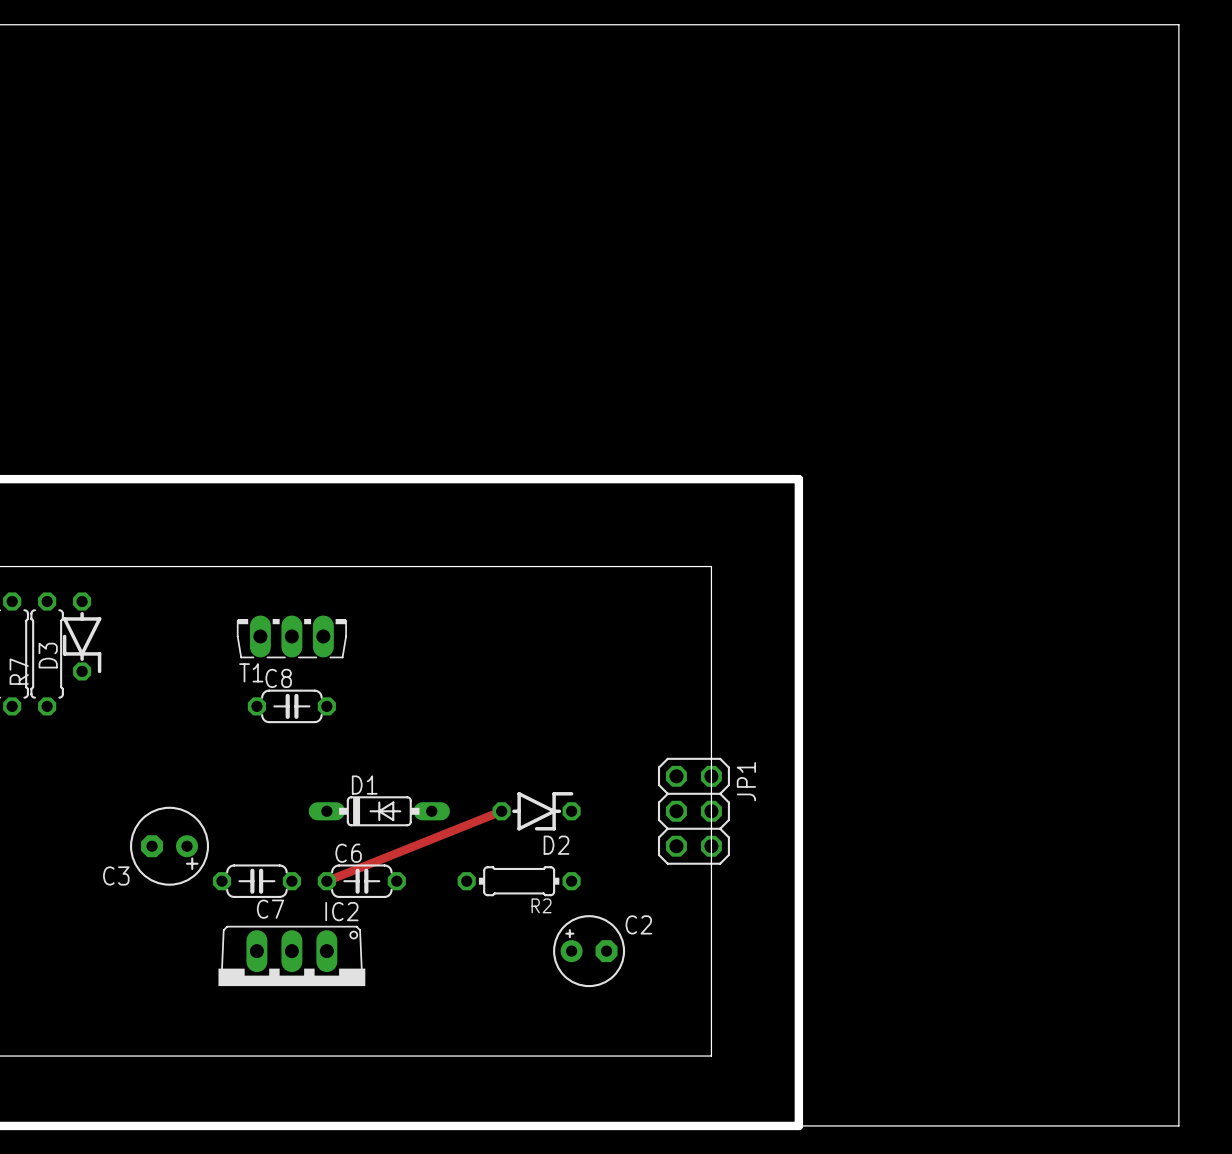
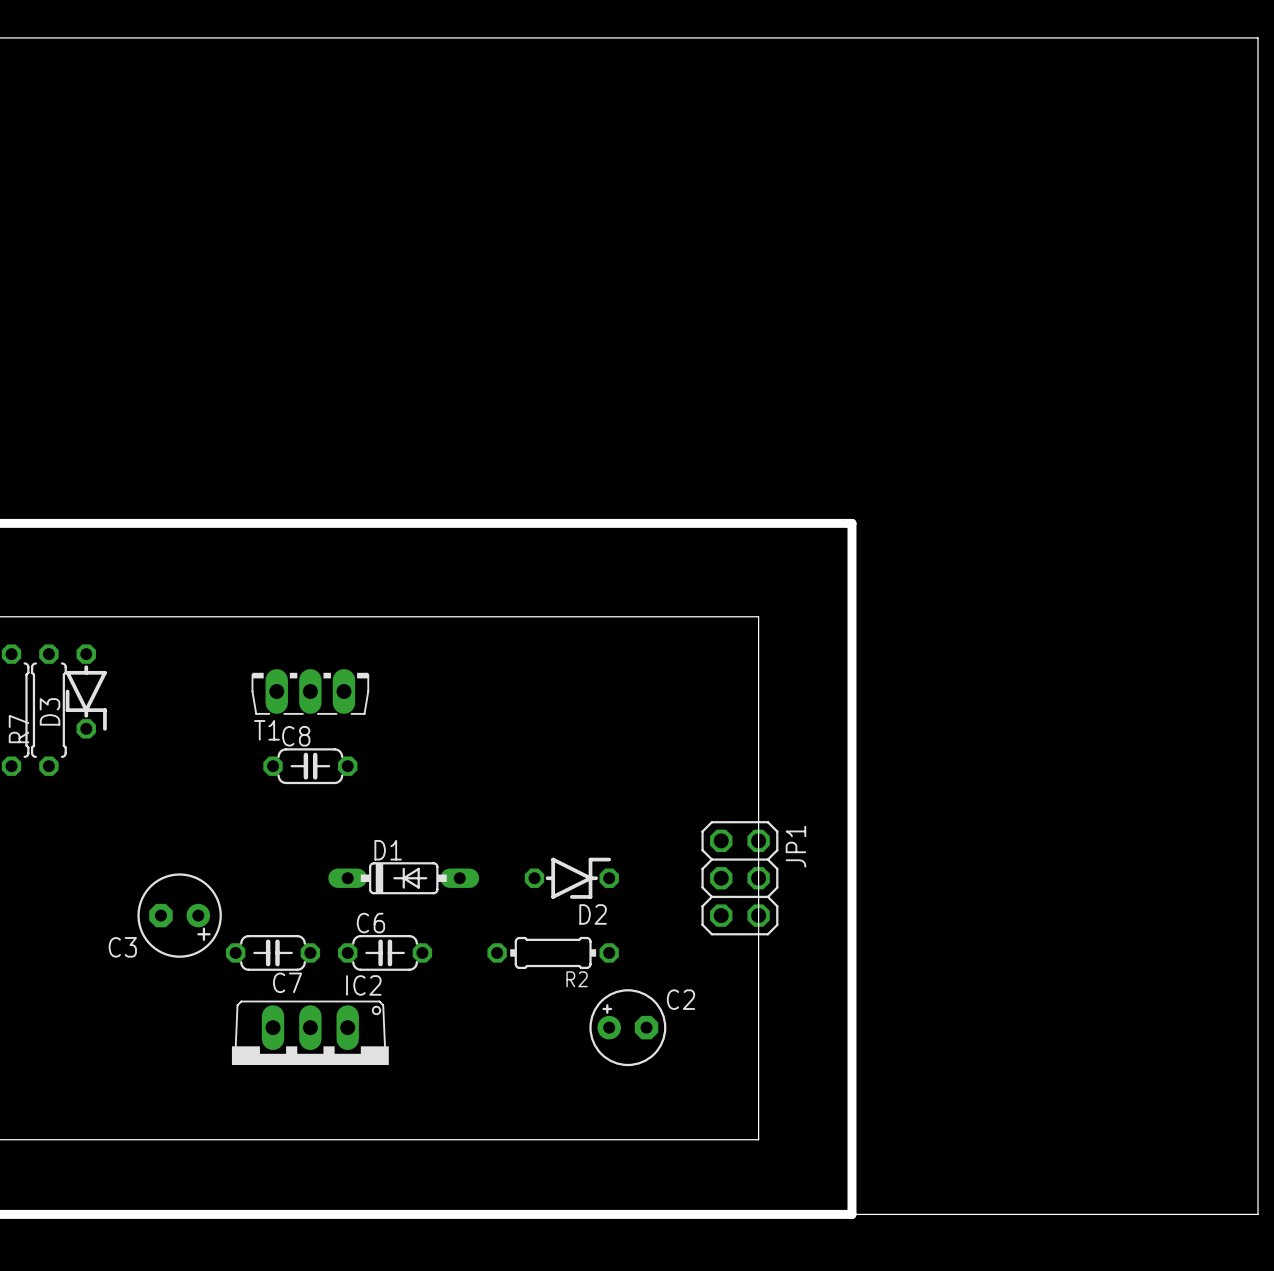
track: (501, 811) (326, 881) -> none

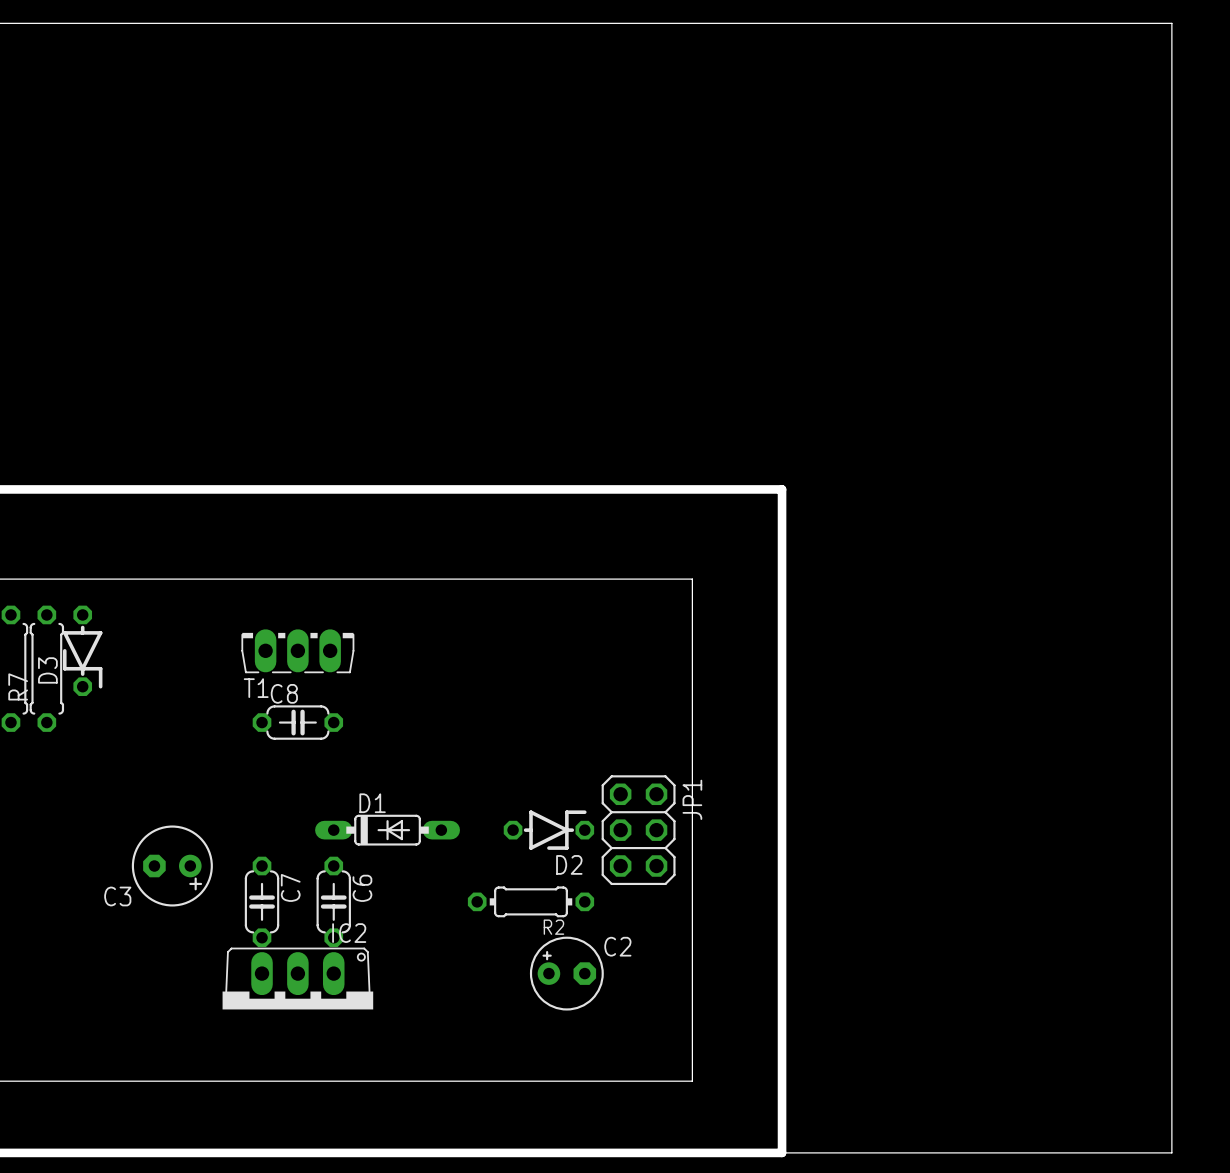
board edge: (1220, 37) (1258, 37) (1258, 1214) (1220, 1214) -> (1171, 23) (1171, 1152)
board edge: (814, 523) (851, 523) (851, 1214) -> (782, 489) (782, 1152)
board edge: (721, 616) (758, 616) (758, 1139) (721, 1139) -> (692, 579) (692, 1081)
JP1 position: (739, 878) -> (638, 830)
C7 rotation: 0° (273, 952) -> 90° counterclockwise (262, 901)
C6 rotation: 0° (385, 952) -> 90° clockwise (333, 901)
C2 position: (627, 1027) -> (566, 973)
board edge width: thick (814, 1214) (851, 1214) -> thin (782, 1152) (817, 1152)

